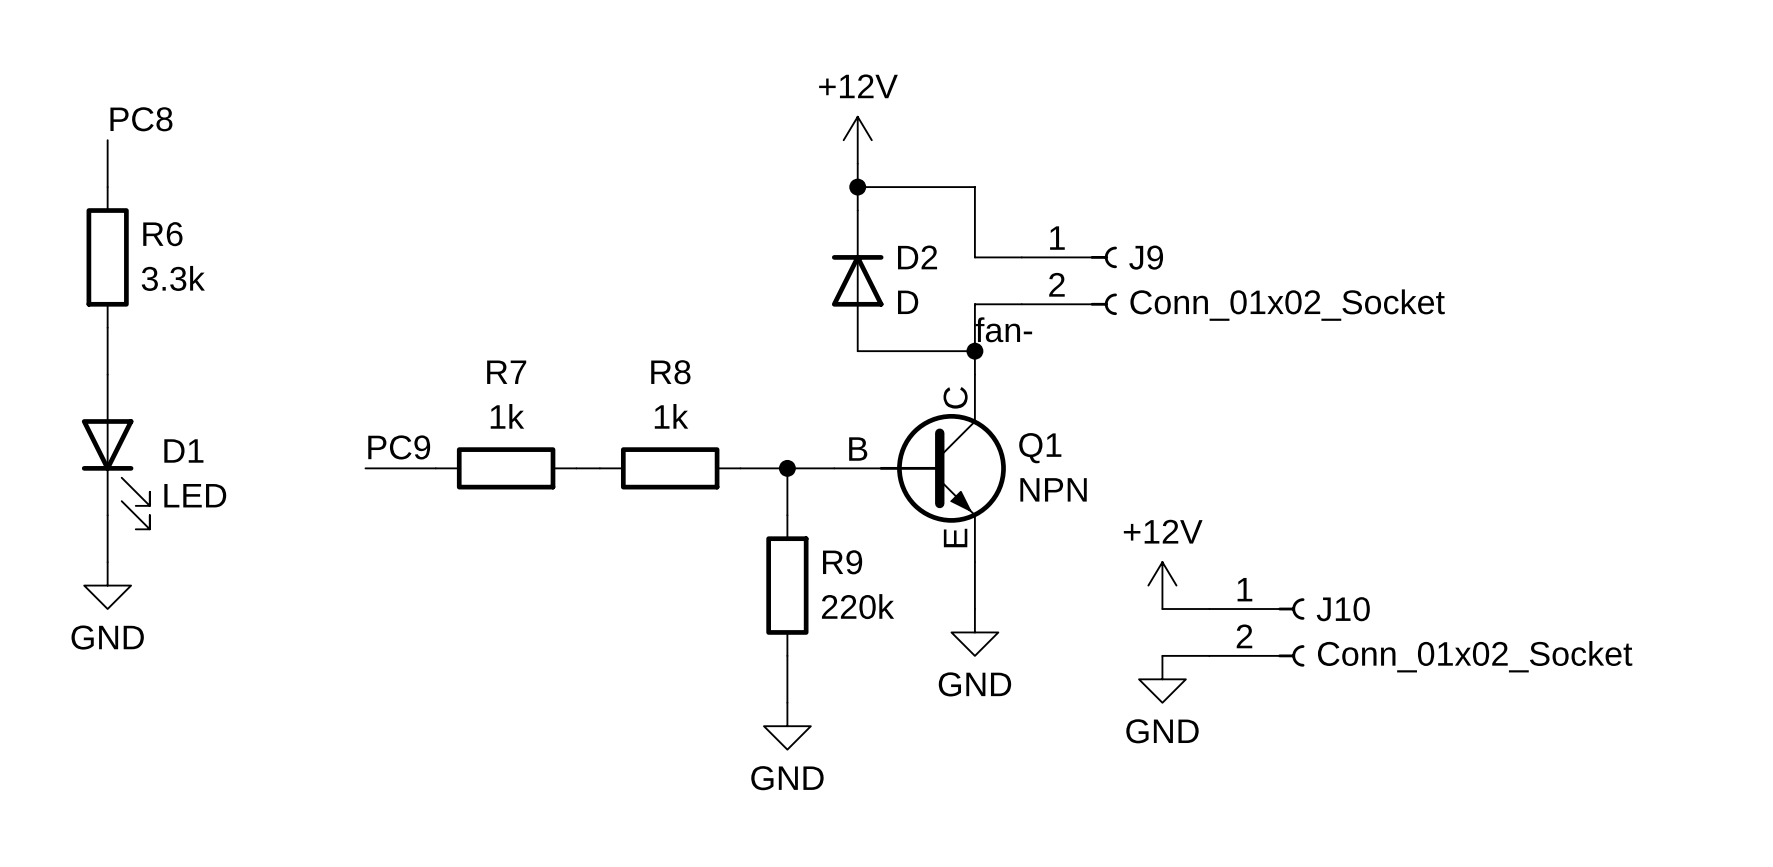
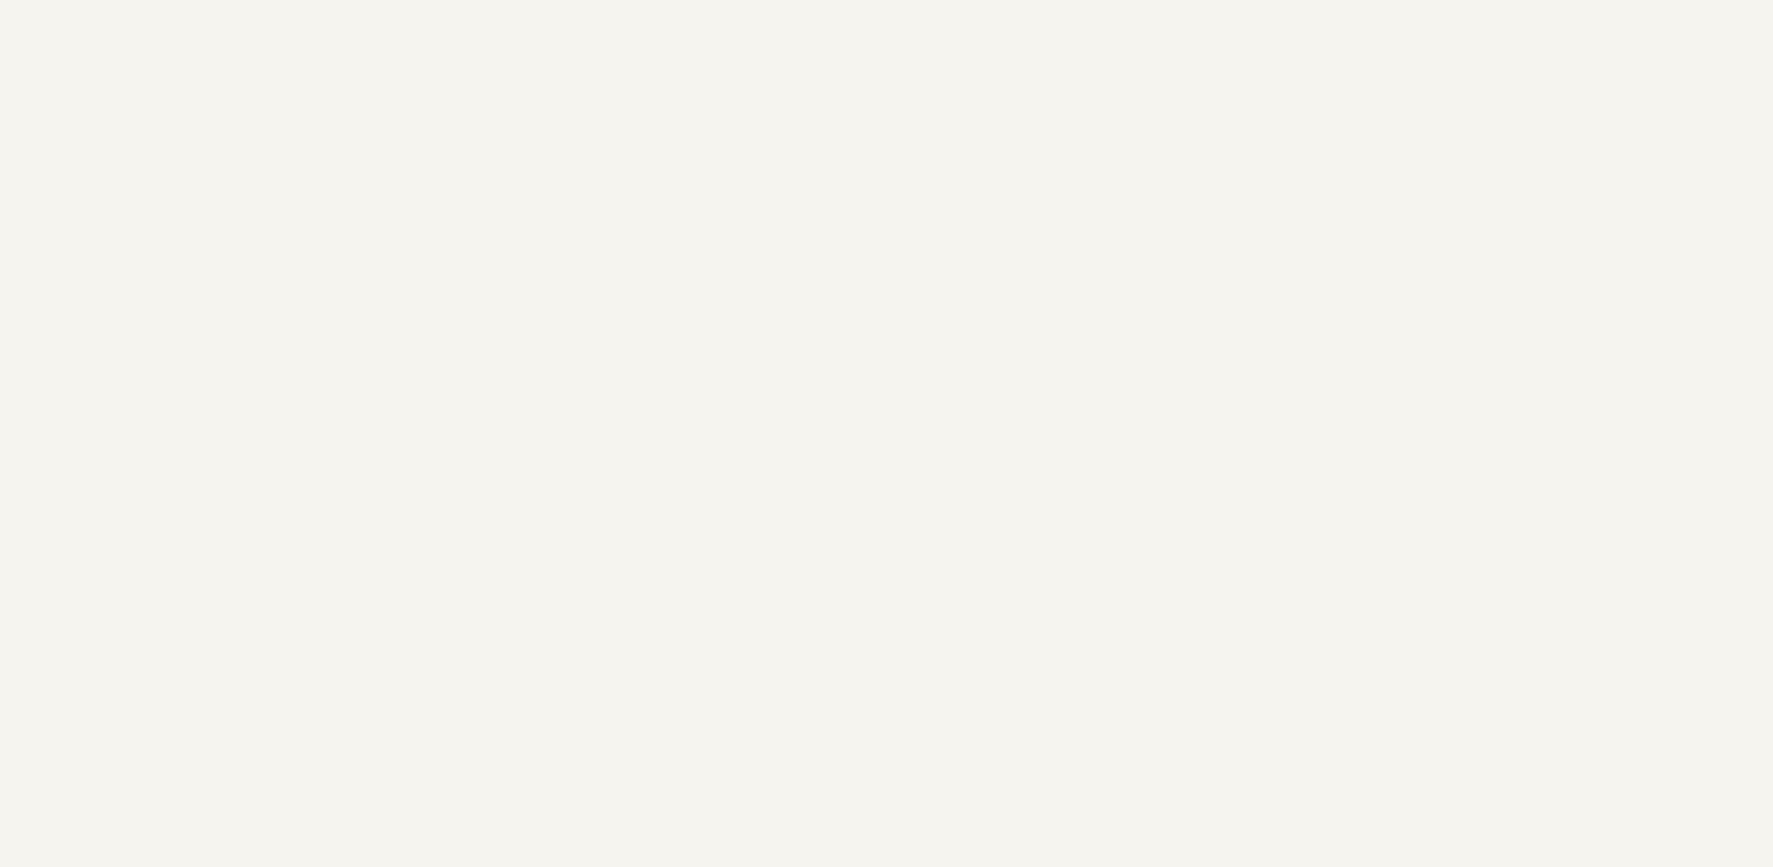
label: PC8 (141, 119) -> none
wire: (107, 140) (107, 187) -> none
power symbol: +12V (857, 140) -> none
wire: (857, 163) (857, 210) -> none
wire: (857, 187) (974, 187) (974, 257) (1021, 257) -> none
junction: (857, 187) -> none
R6: 3.3k (107, 257) -> none
D2: D (857, 280) -> none
J9: Conn_01x02_Socket (1069, 280) -> none
wire: (1021, 304) (974, 304) (974, 374) -> none
wire: (107, 327) (107, 374) -> none
label: fan- (1003, 329) -> none
wire: (857, 351) (974, 351) -> none
junction: (974, 351) -> none
label: PC9 (399, 447) -> none
D1: LED (115, 451) -> none
wire: (365, 468) (435, 468) -> none
R7: 1k (506, 468) -> none
wire: (576, 468) (599, 468) -> none
R8: 1k (670, 468) -> none
wire: (740, 468) (834, 468) -> none
wire: (787, 468) (787, 515) -> none
junction: (787, 468) -> none
Q1: NPN (920, 468) -> none
wire: (107, 515) (107, 562) -> none
wire: (974, 562) (974, 609) -> none
power symbol: GND (107, 585) -> none
R9: 220k (787, 585) -> none
power symbol: +12V (1162, 585) -> none
wire: (1162, 609) (1209, 609) -> none
power symbol: GND (974, 632) -> none
J10: Conn_01x02_Socket (1256, 632) -> none
wire: (787, 655) (787, 702) -> none
wire: (1162, 655) (1209, 655) -> none
power symbol: GND (1162, 679) -> none
power symbol: GND (787, 726) -> none

